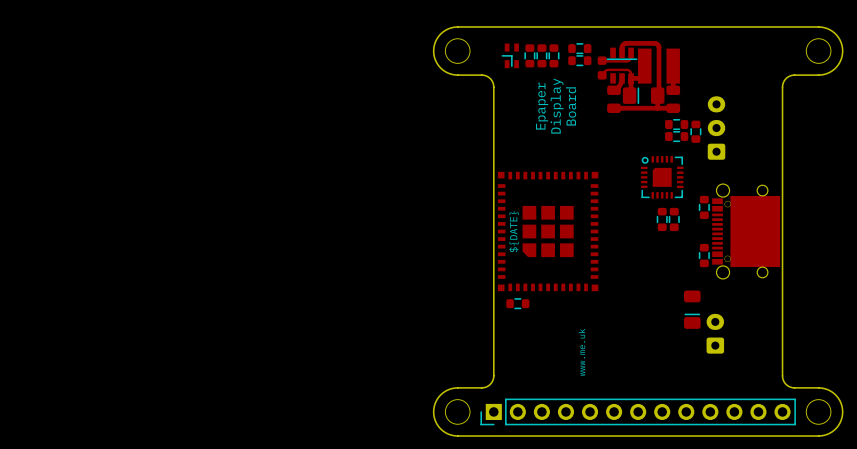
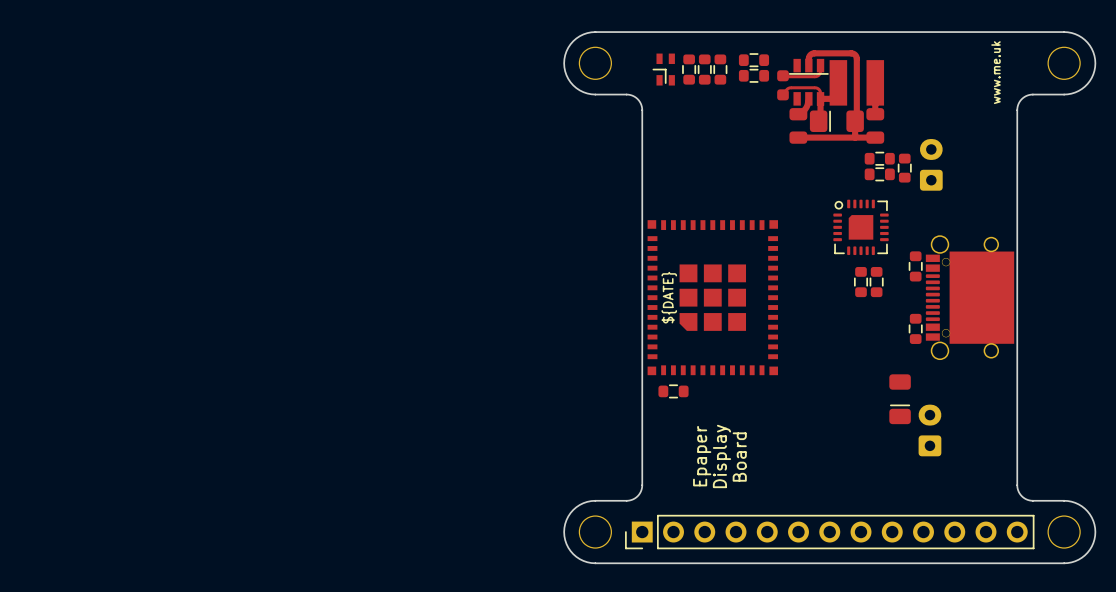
drawing: none -> [991, 41, 1001, 104]
part footprint: [707, 96, 726, 160] -> [919, 139, 943, 191]
text: Epaper (542, 106) -> none
text: Display (557, 106) -> none
text: Board (571, 106) -> none
drawing: [578, 328, 586, 377] -> none
text: none -> Epaper (702, 456)
text: none -> Display (721, 456)
text: none -> Board (739, 457)

